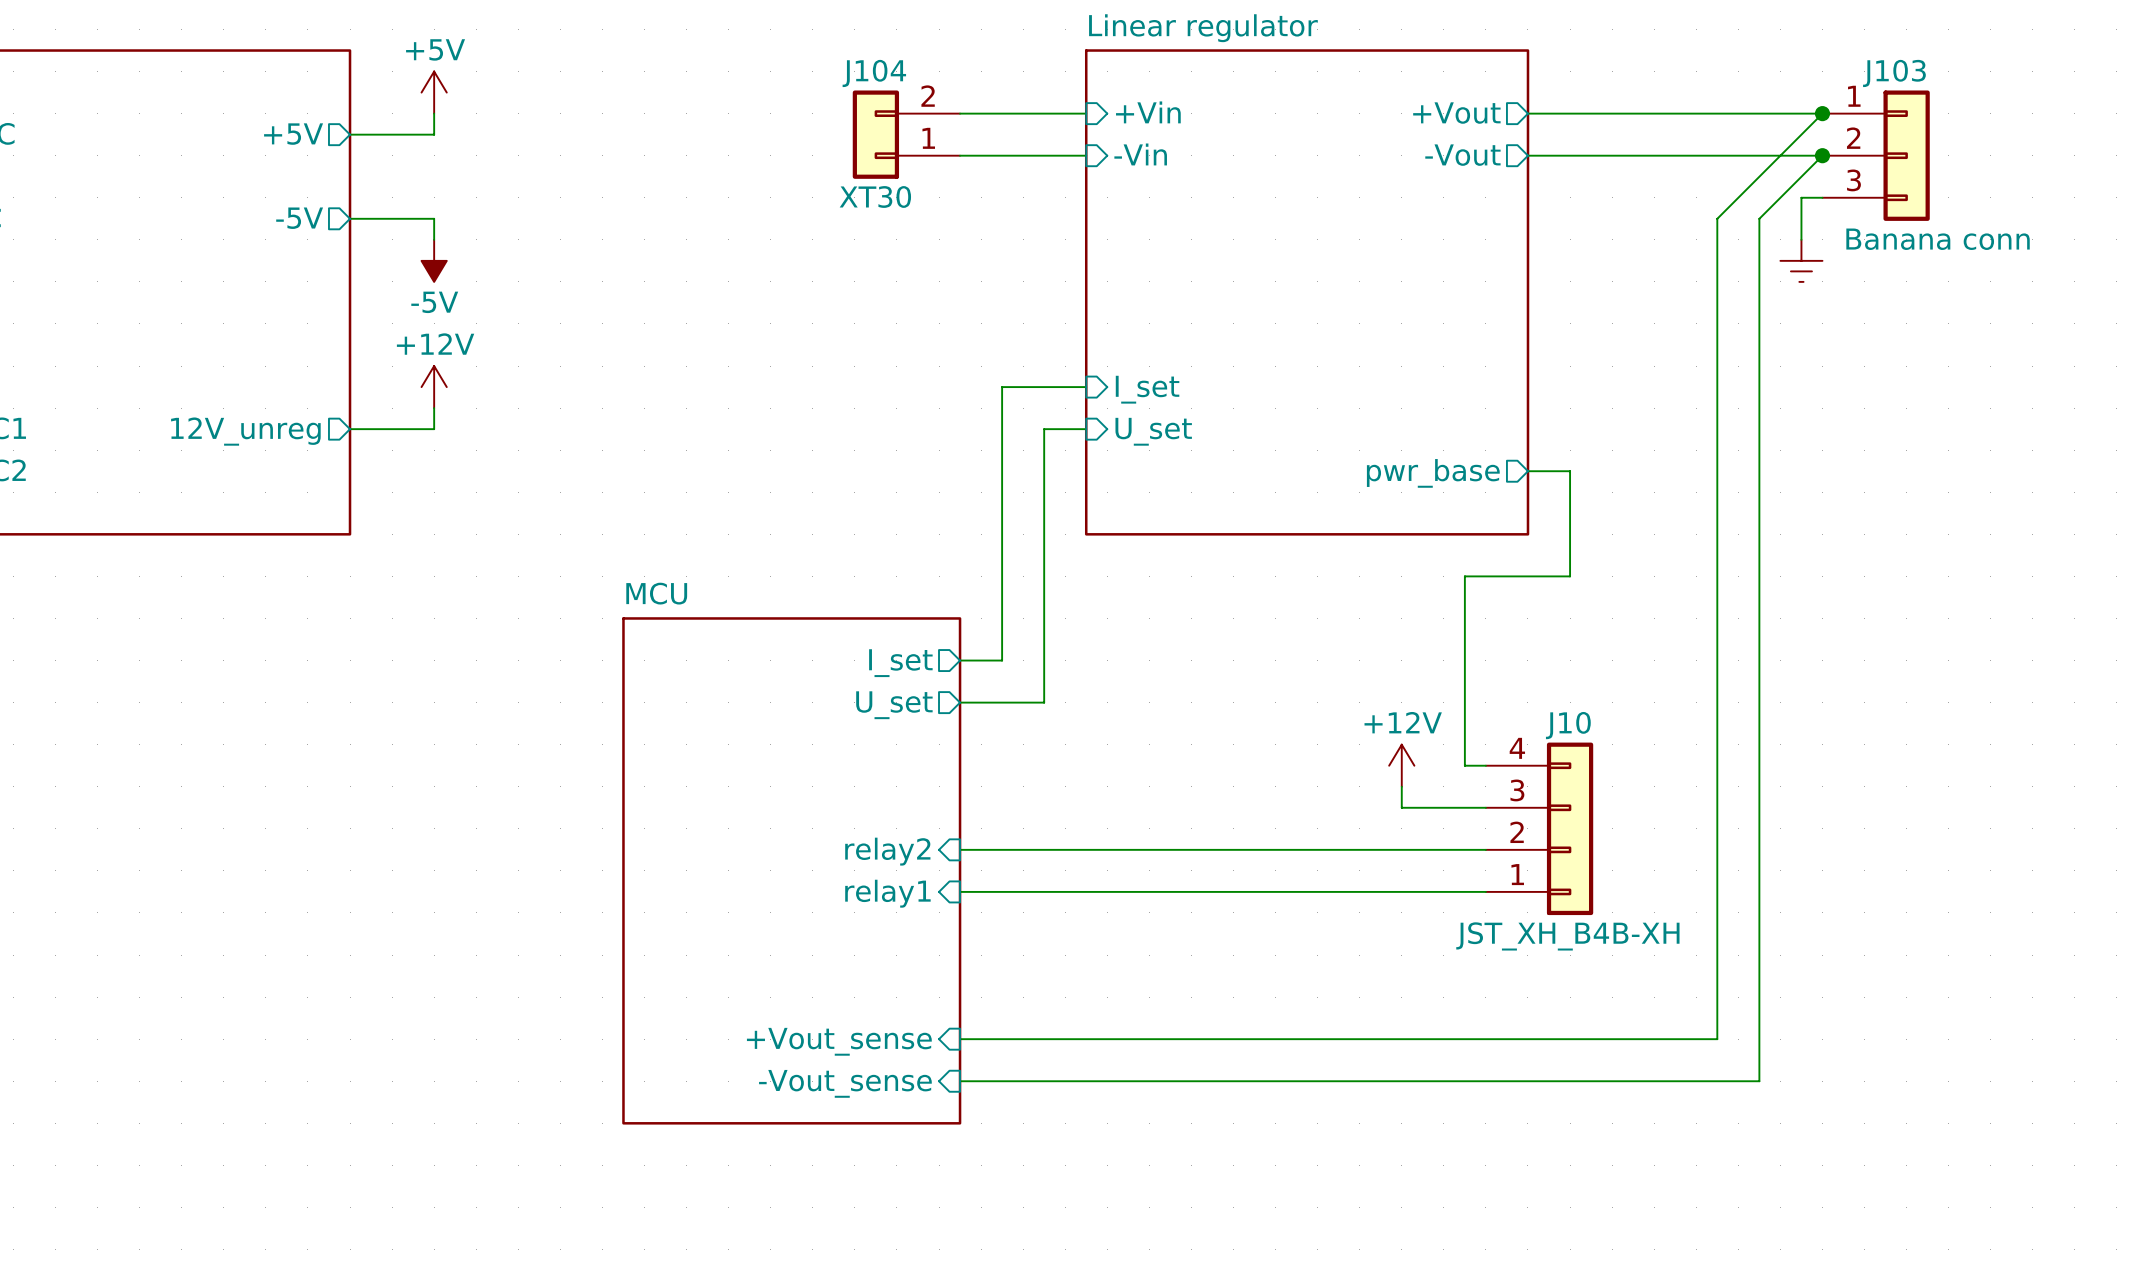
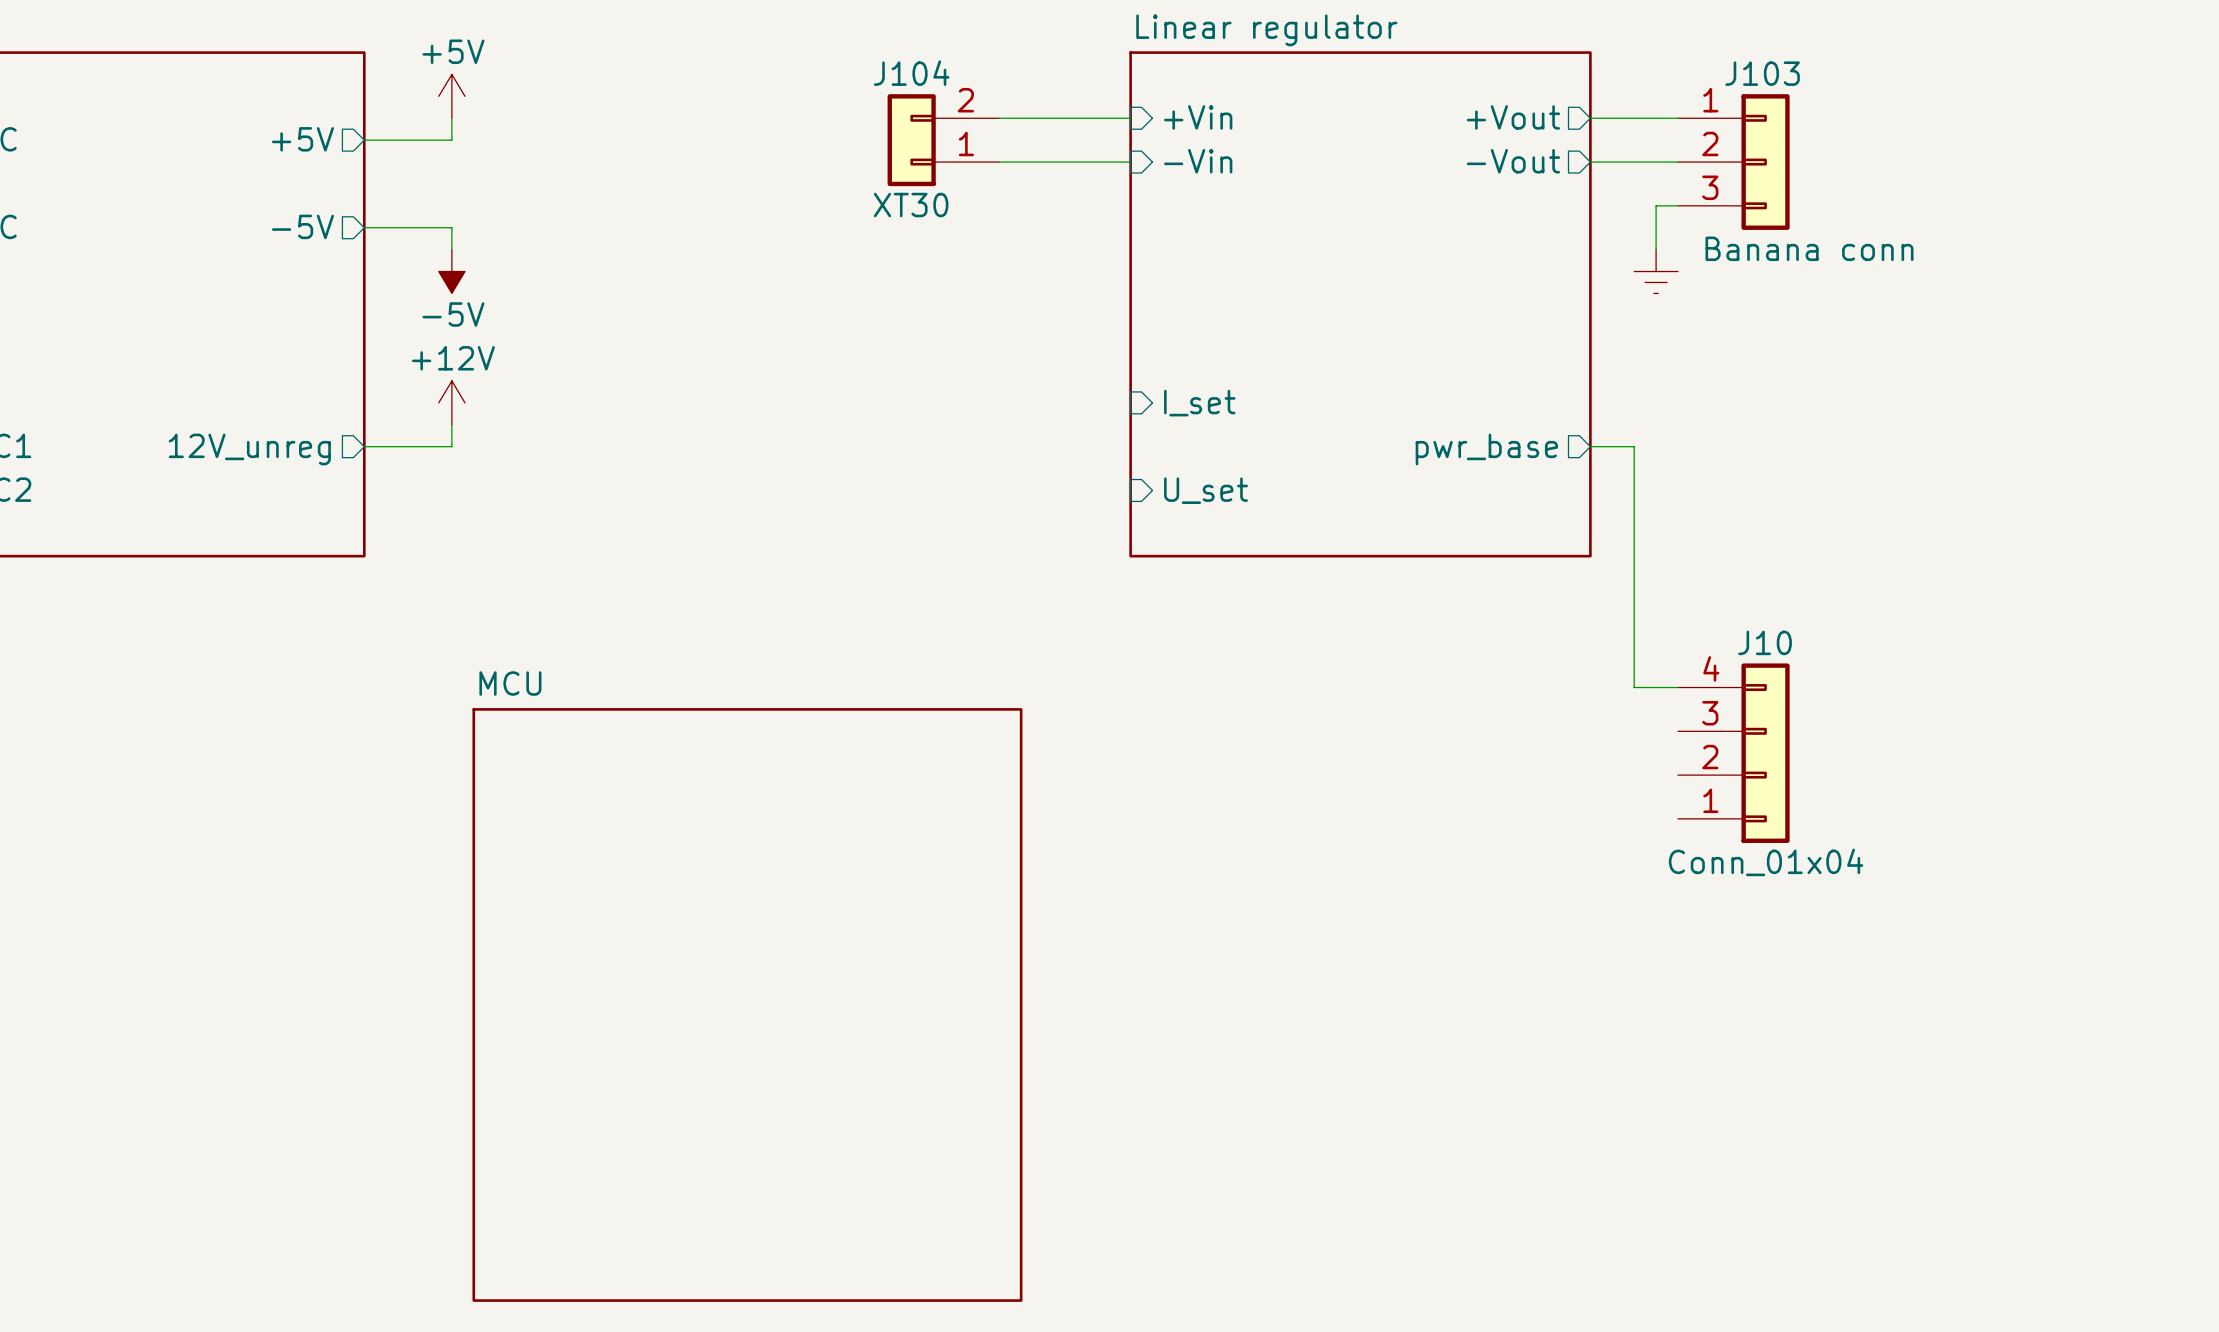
wire: (1612, 113) (1822, 113) (1717, 218) (1717, 1039) (960, 1039) -> none
junction: (1822, 113) -> none
wire: (1612, 155) (1822, 155) (1759, 218) (1759, 1081) (960, 1081) -> none
junction: (1822, 155) -> none
J103 position: (1876, 155) -> (1733, 162)
wire: (1822, 197) (1801, 197) (1801, 239) -> (1677, 205) (1656, 205) (1656, 249)
power symbol position: (1801, 260) -> (1656, 271)
wire: (1086, 387) (1002, 387) (1002, 660) (960, 660) -> none
wire: (1086, 429) (1044, 429) (1044, 702) (960, 702) -> none
sheet pin position: U_set (1153, 431) -> U_set (1206, 490)
wire: (1527, 471) (1570, 471) -> (1590, 446) (1634, 446) (1634, 490)
sheet pin position: pwr_base (1433, 473) -> pwr_base (1486, 449)
wire: (1570, 576) (1464, 576) (1464, 765) (1485, 765) -> (1634, 599) (1634, 687) (1677, 687)
sheet pin: I_set (900, 663) -> none
sheet pin: U_set (894, 705) -> none
power symbol: +12V (1401, 765) -> none
wire: (1401, 786) (1401, 807) (1485, 807) -> none
J10 position: (1539, 828) -> (1733, 753)
wire: (960, 849) (1485, 849) -> none
sheet pin: relay2 (887, 851) -> none
sheet MCU: (791, 870) -> none
wire: (960, 891) (1485, 891) -> none
sheet pin: relay1 (887, 893) -> none
J10 value: JST_XH_B4B-XH (1567, 936) -> Conn_01x04 (1766, 862)
sheet MCU: none -> (747, 1004)
sheet pin: +Vout_sense (839, 1041) -> none
sheet pin: -Vout_sense (845, 1083) -> none

